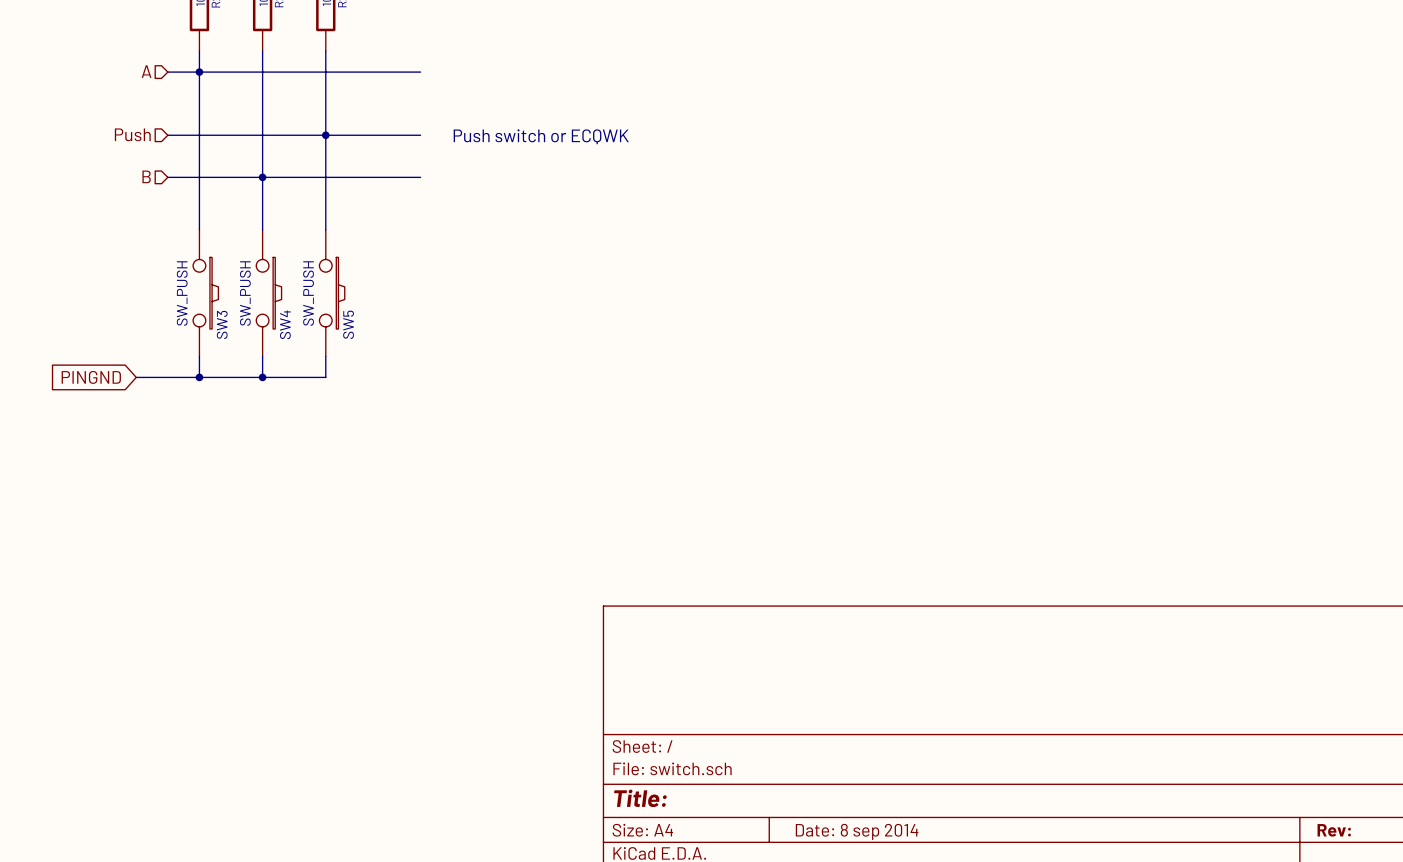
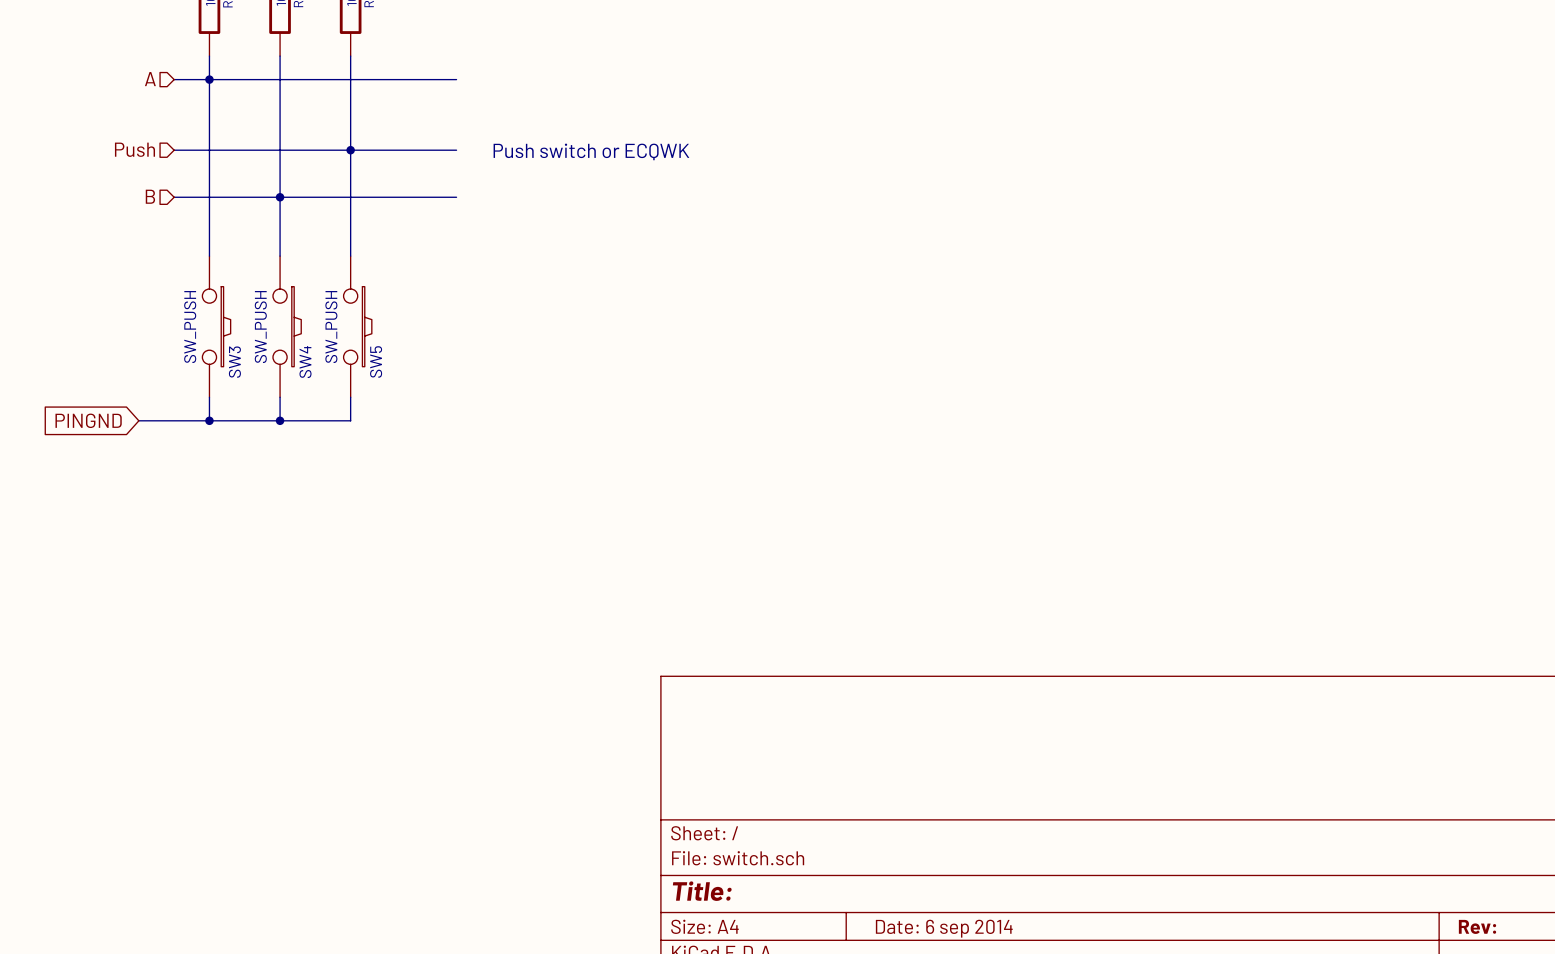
title block: Date: 8 sep 2014 (857, 831) -> Date: 6 sep 2014 (944, 928)

